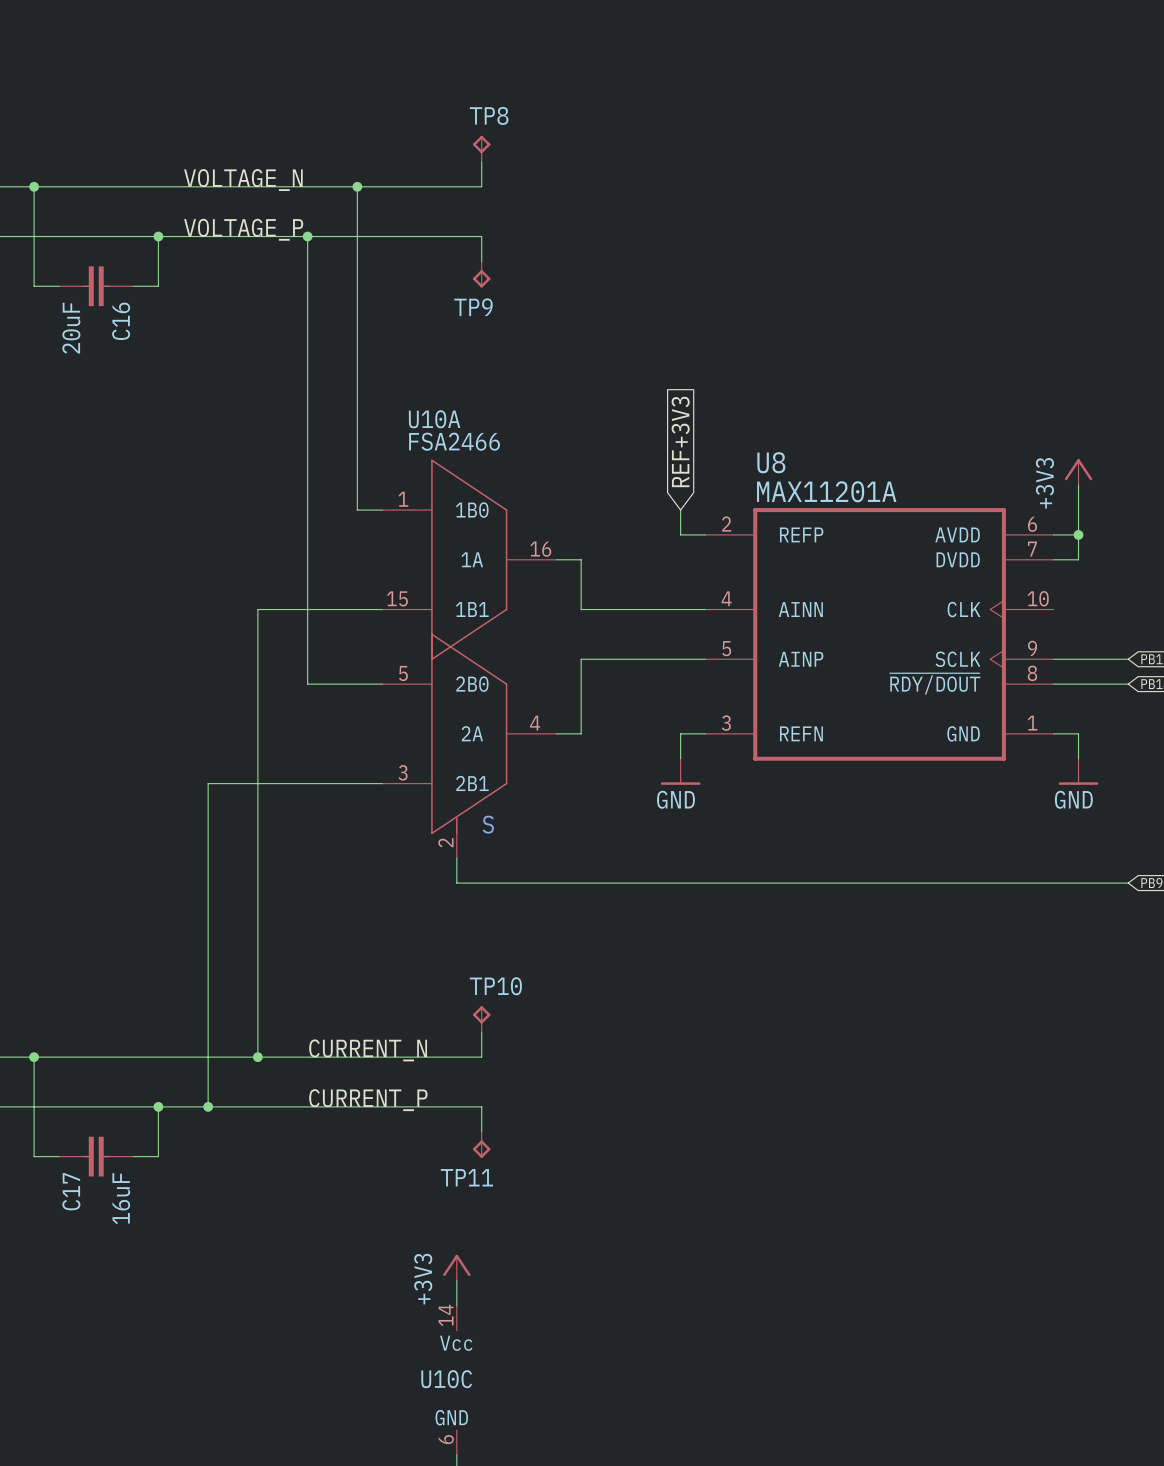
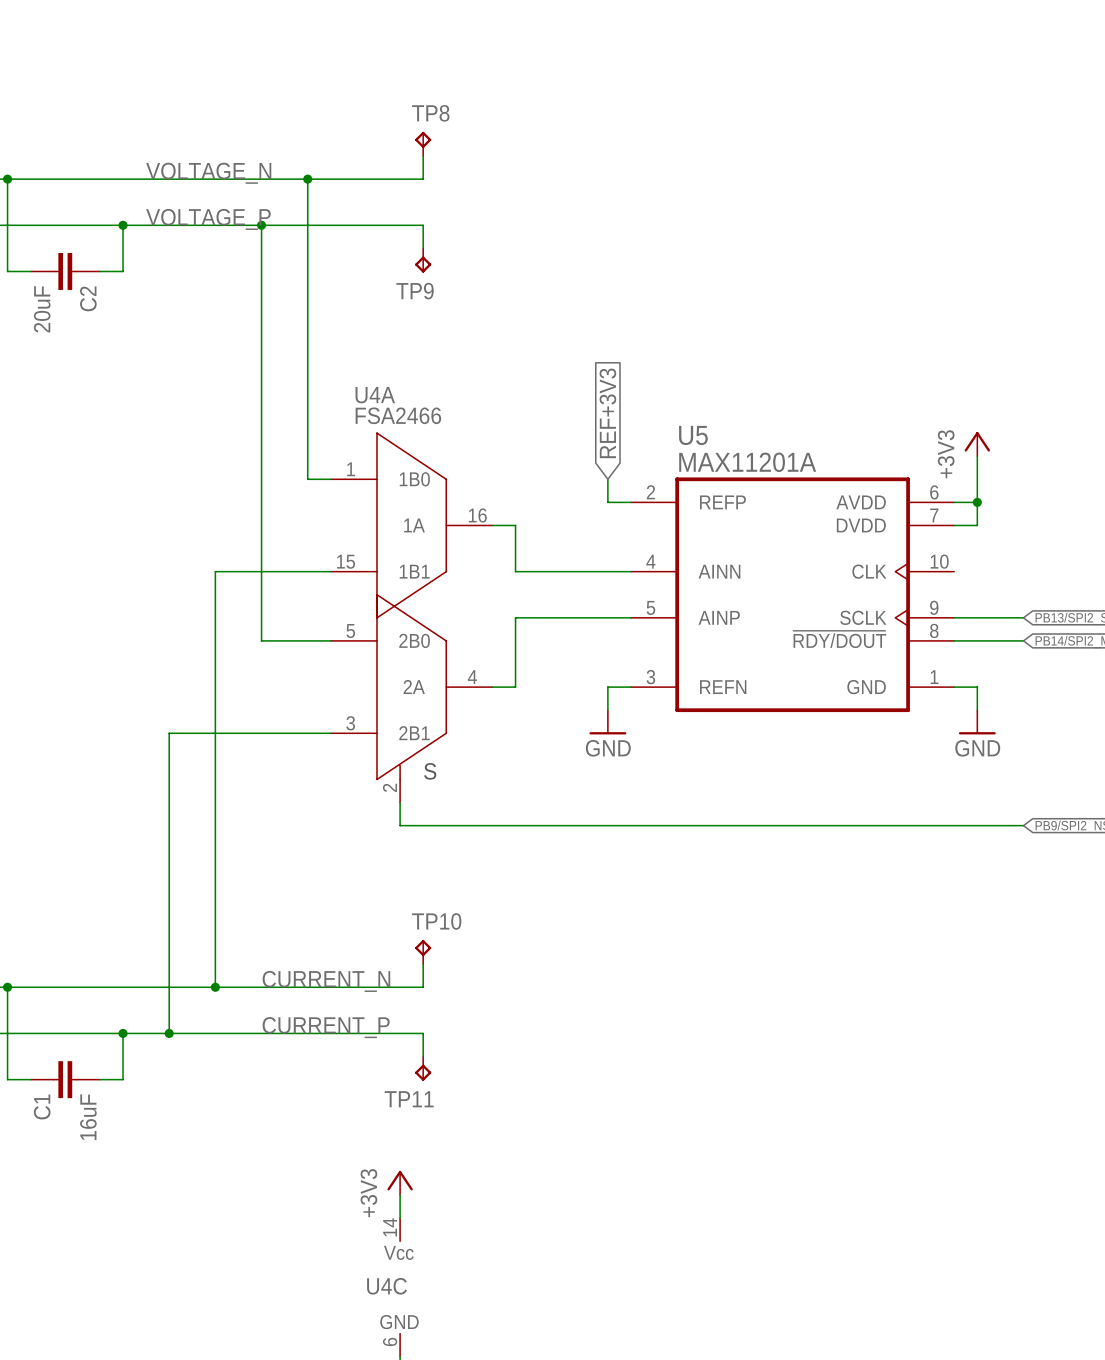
C16 name: C16 (121, 321) -> C2 (88, 298)
U10A name: U10A (434, 419) -> U4A (375, 395)
U8 name: U8 (771, 462) -> U5 (693, 435)
C17 name: C17 (71, 1191) -> C1 (42, 1106)
U10C name: U10C (446, 1379) -> U4C (387, 1286)

